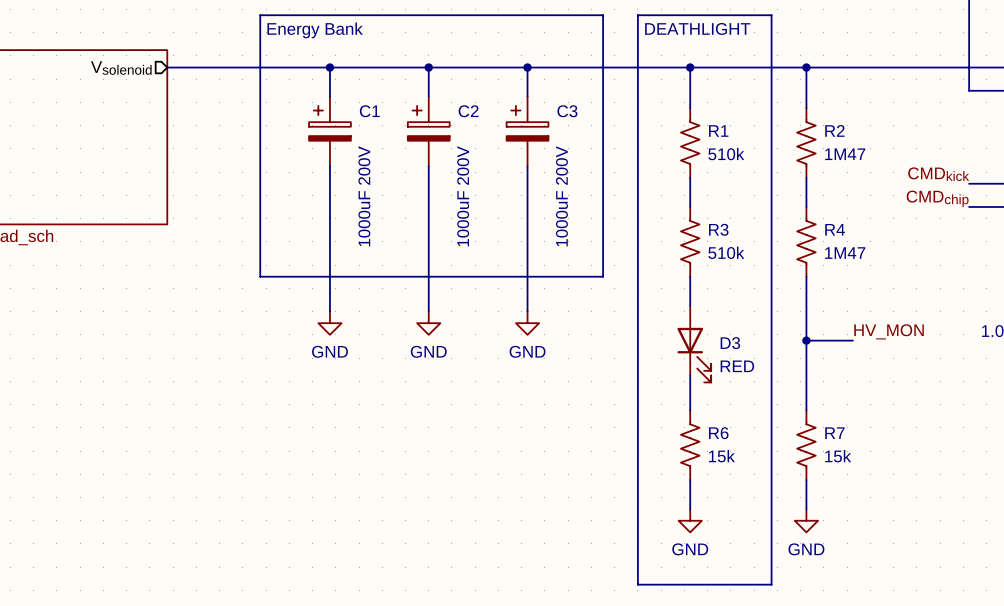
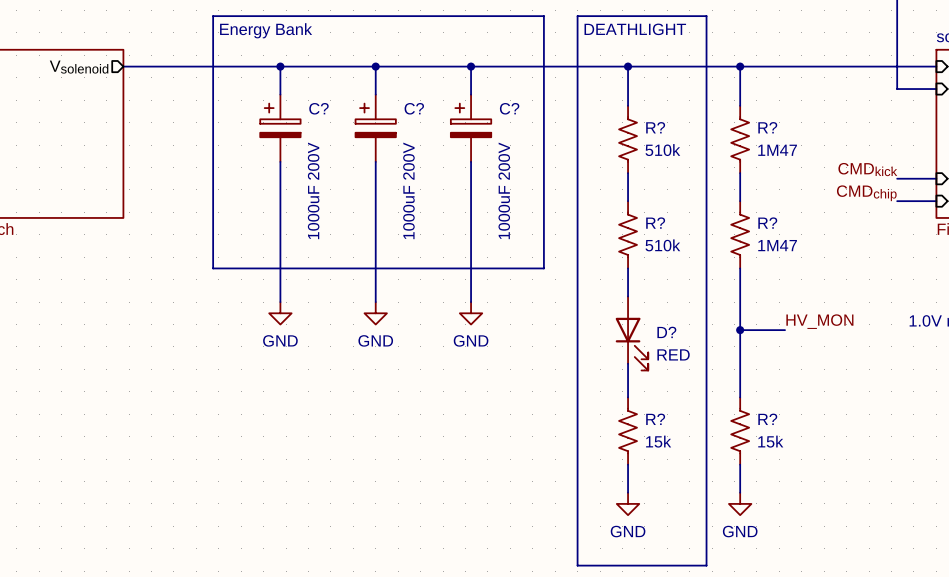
C1 name: C1 (369, 111) -> C? (318, 108)
C2 name: C2 (468, 111) -> C? (414, 108)
C3 name: C3 (567, 111) -> C? (509, 108)
R2 name: R2 (834, 130) -> R? (767, 127)
R1 name: R1 (718, 131) -> R? (655, 127)
R3 name: R3 (718, 229) -> R? (655, 223)
R4 name: R4 (835, 229) -> R? (767, 223)
D3 name: D3 (730, 343) -> D? (666, 332)
R6 name: R6 (718, 433) -> R? (655, 419)
R7 name: R7 (834, 433) -> R? (767, 419)

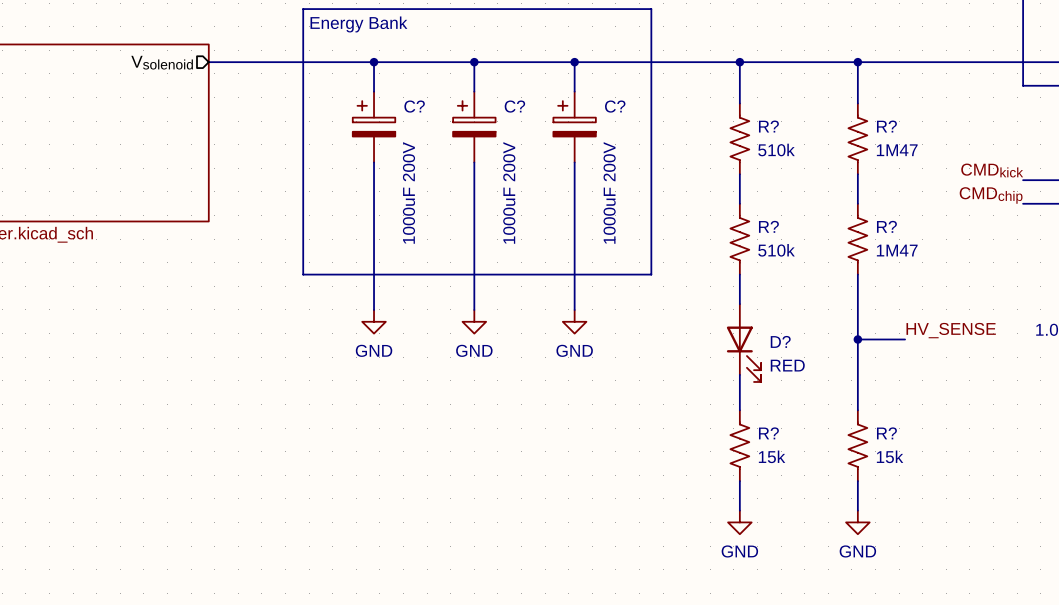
line: (577, 16) (706, 16) (706, 565) (577, 565) (577, 16) -> none
text: DEATHLIGHT (635, 29) -> none
label: HV_MON (819, 321) -> HV_SENSE (951, 330)

